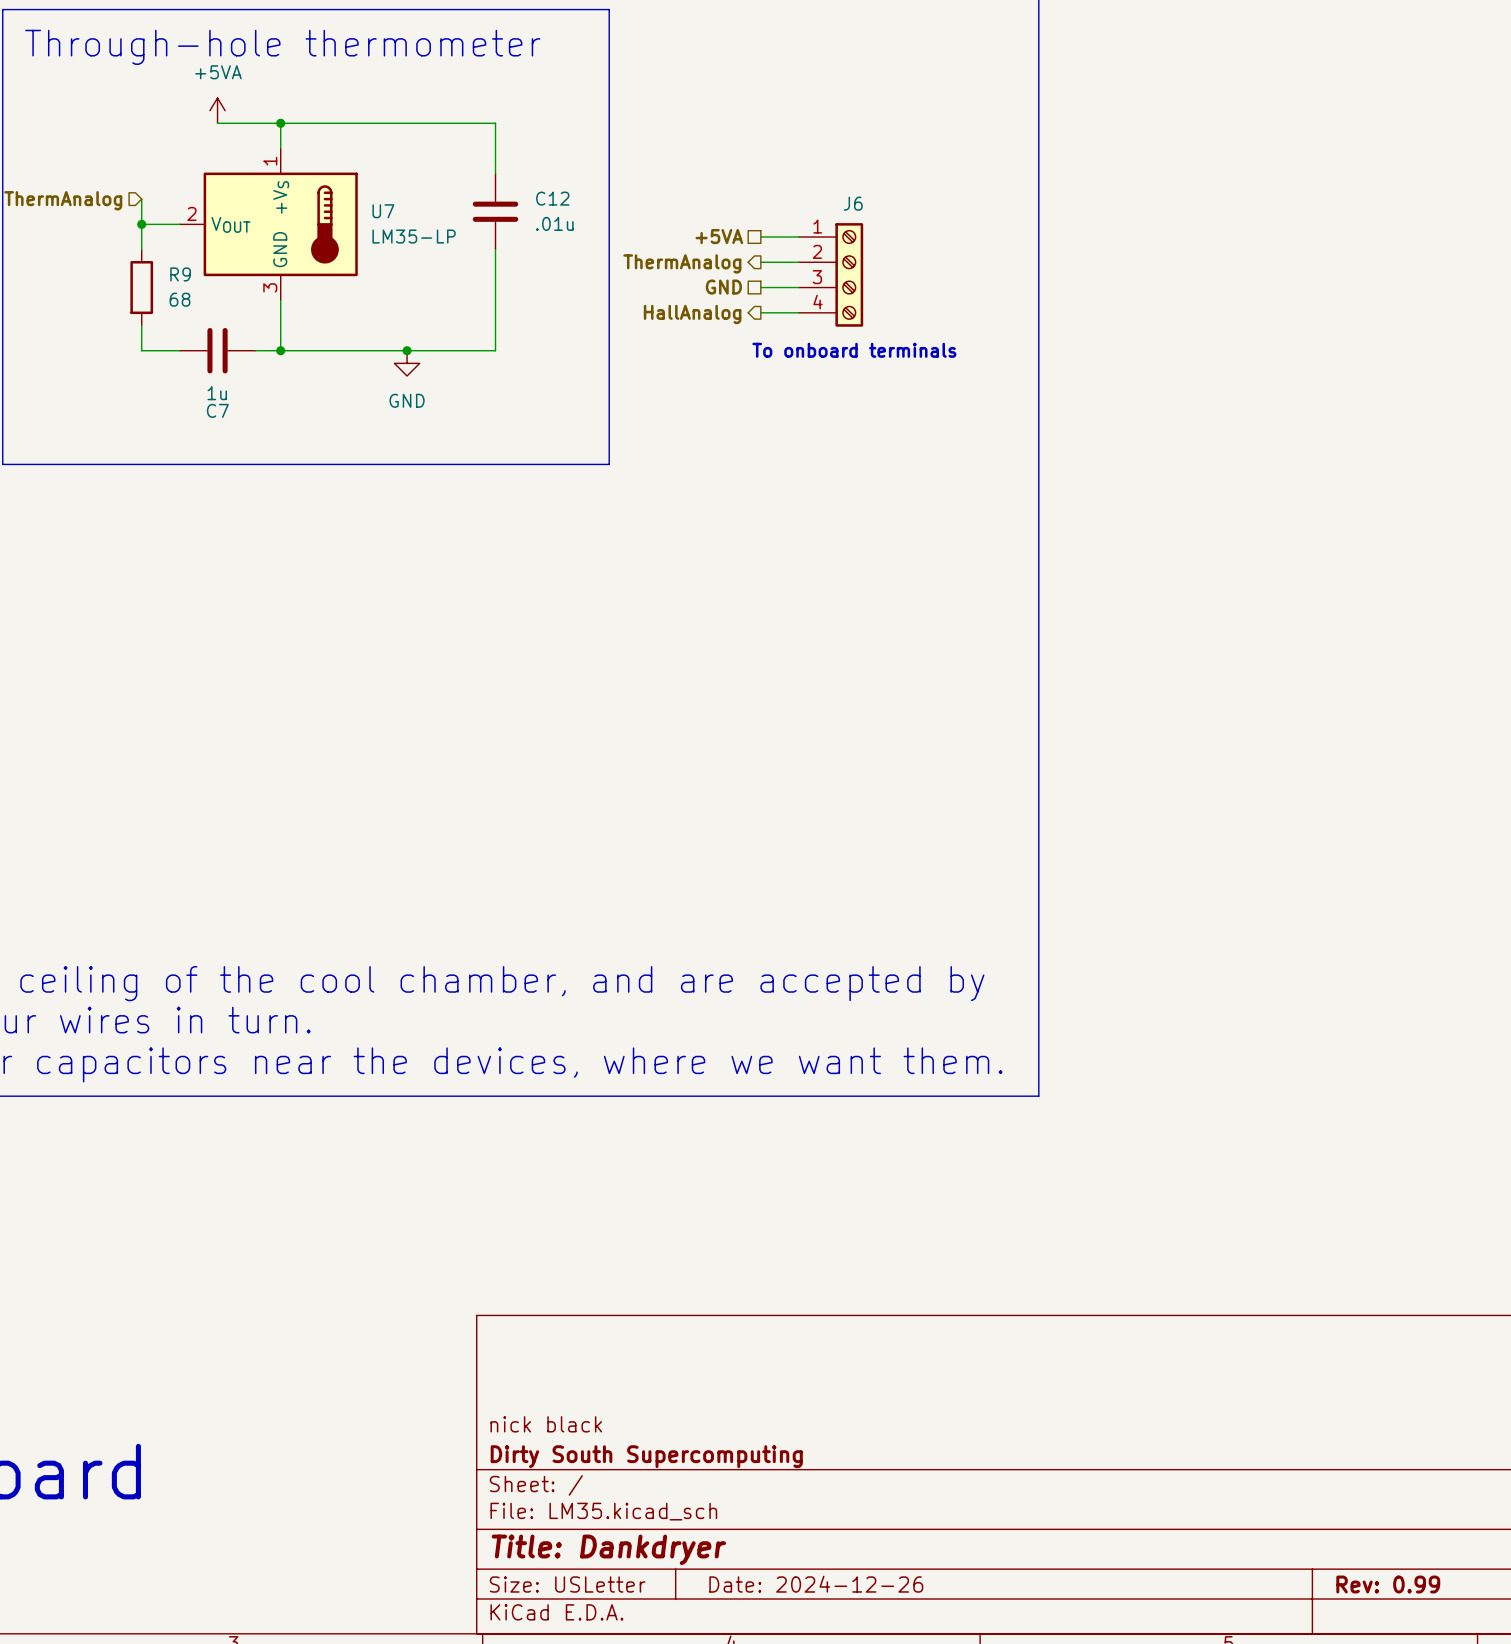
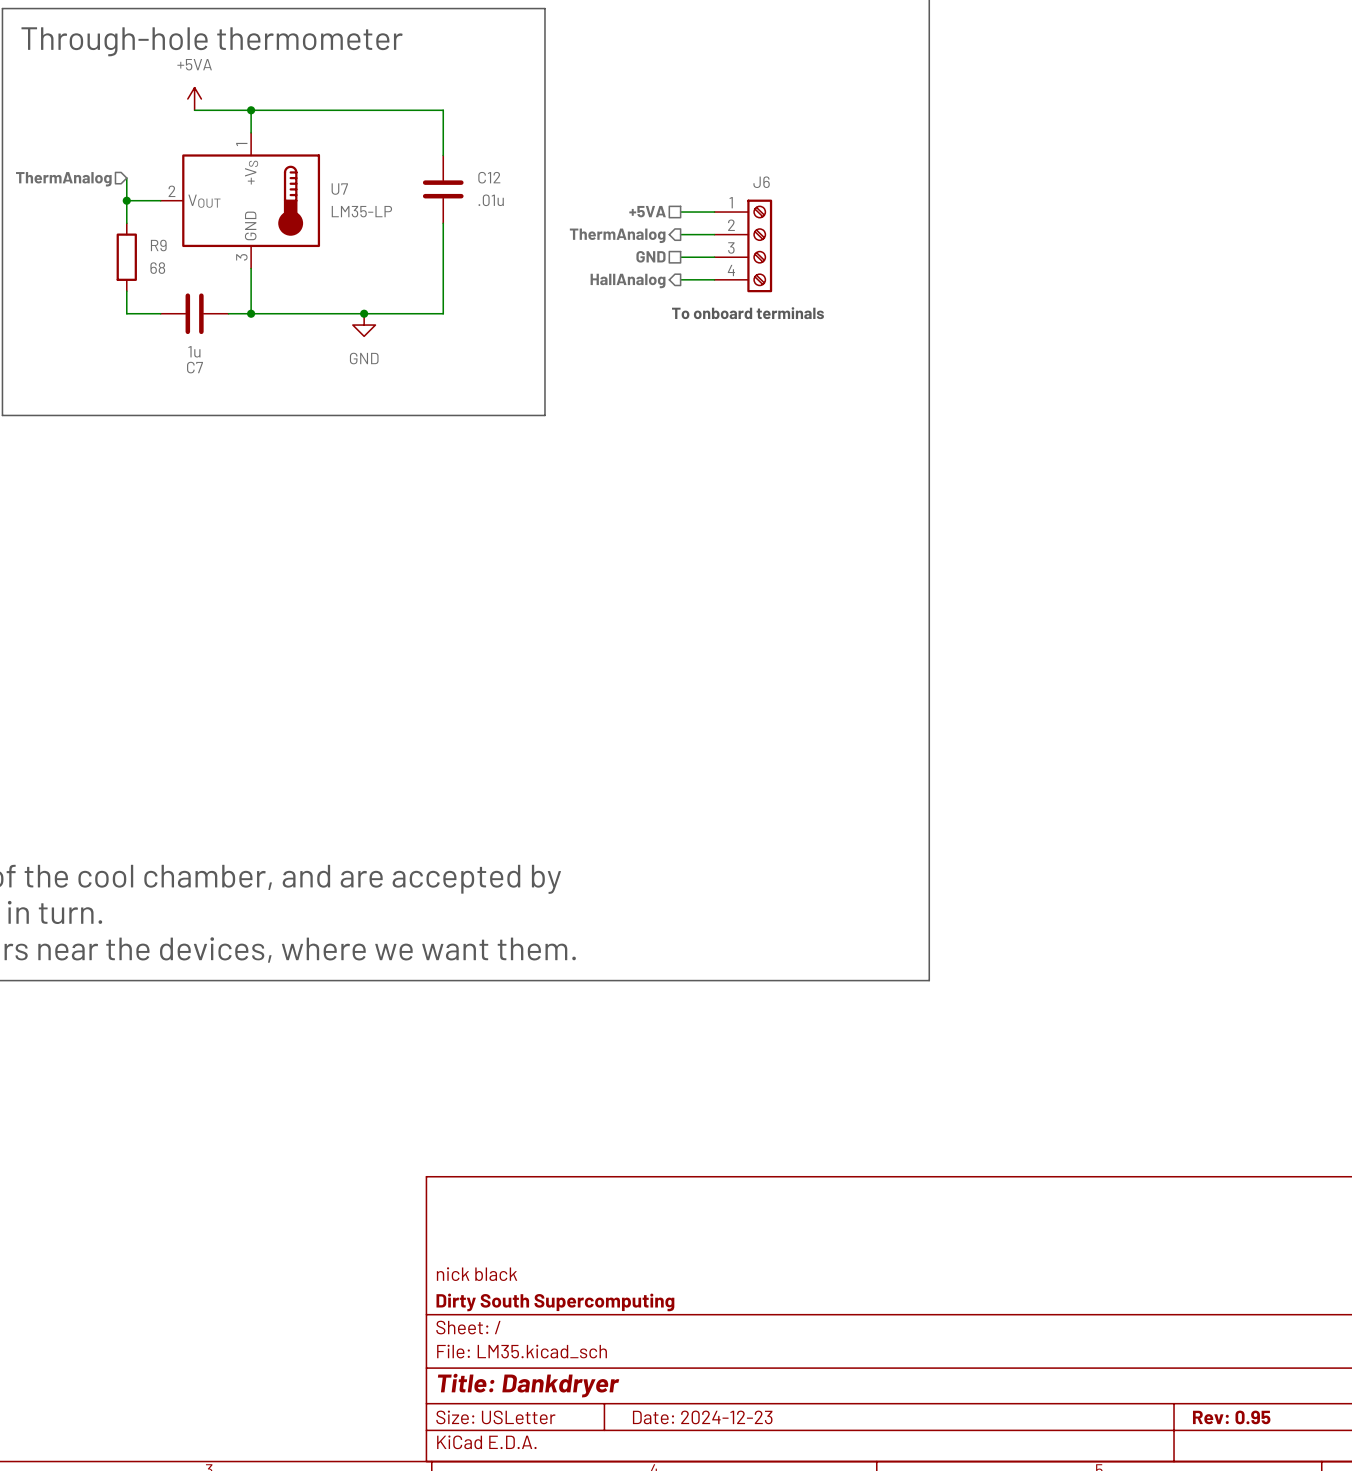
title block: Date: 2024-12-26 (816, 1584) -> Date: 2024-12-23 (702, 1417)
title block: Rev: 0.99 (1388, 1584) -> Rev: 0.95 (1231, 1417)

